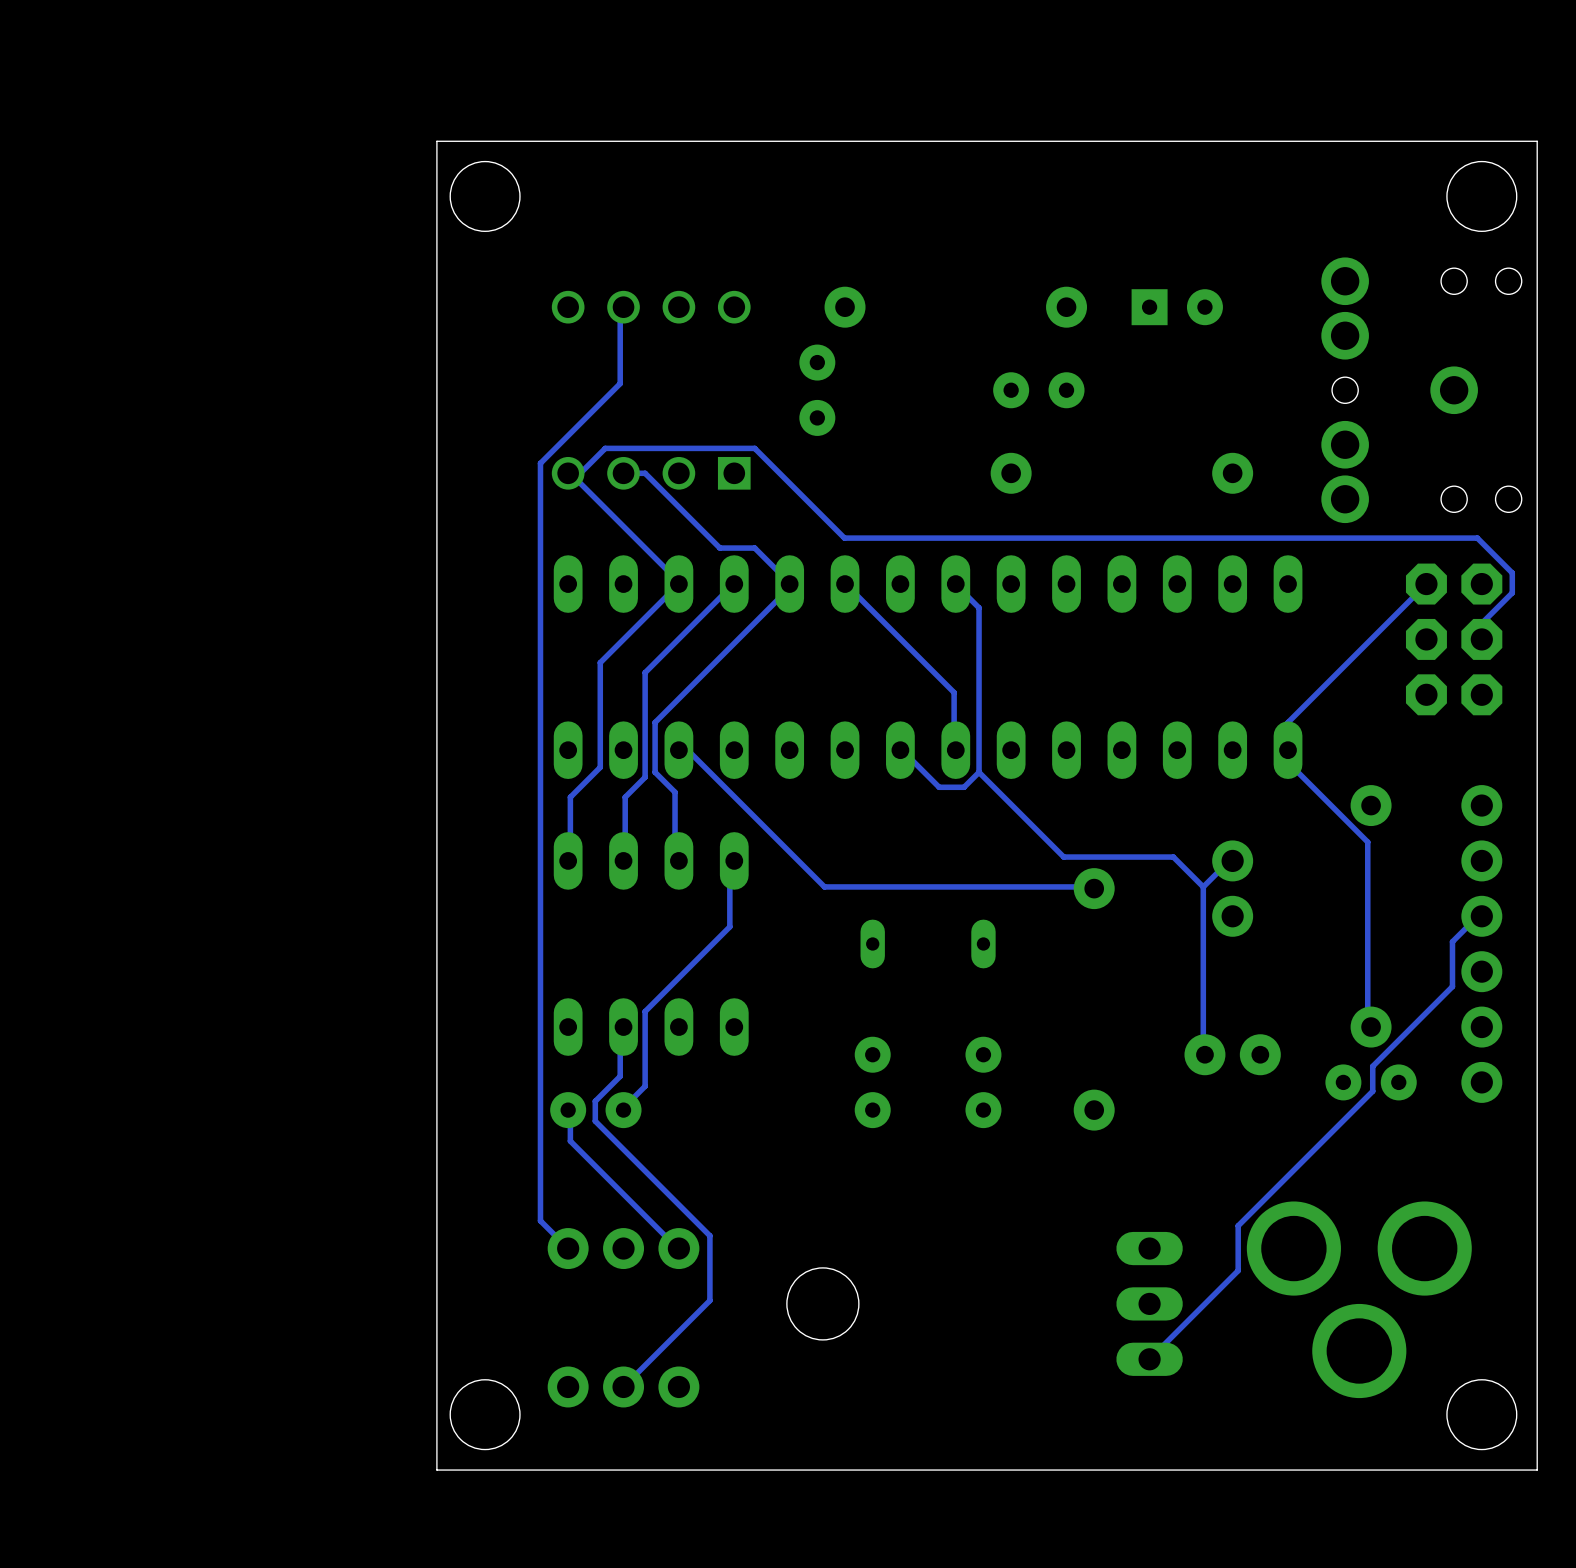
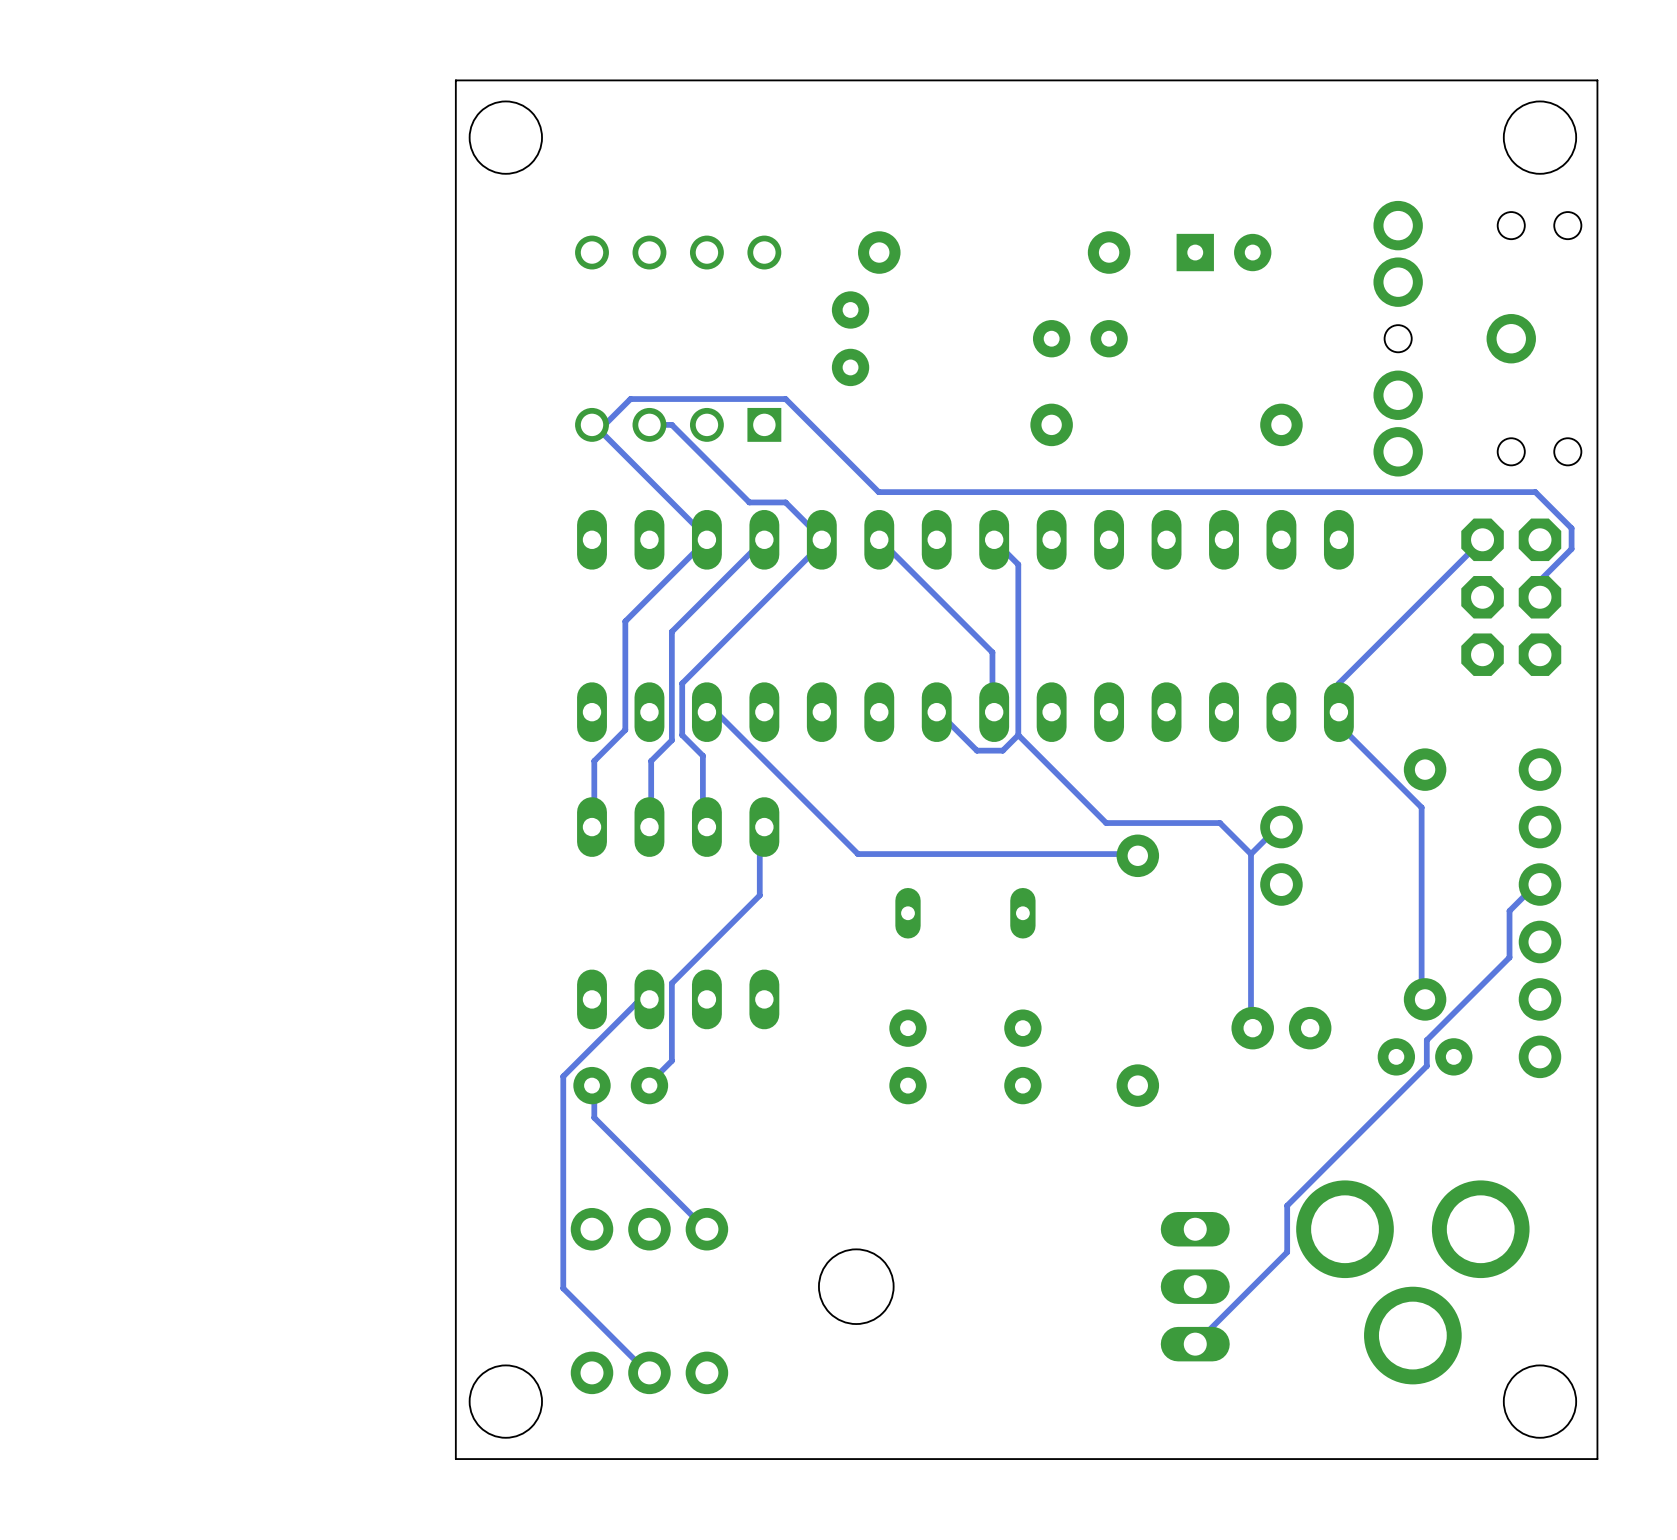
track: (623, 307) (620, 308) (620, 383) (540, 463) (540, 1101) -> none
track: (620, 1031) (620, 1076) (595, 1101) (595, 1121) (709, 1235) (709, 1300) (623, 1386) -> (646, 1004) (635, 1004) (563, 1076)
track: (540, 1220) (568, 1248) -> (563, 1200) (563, 1288) (649, 1372)

